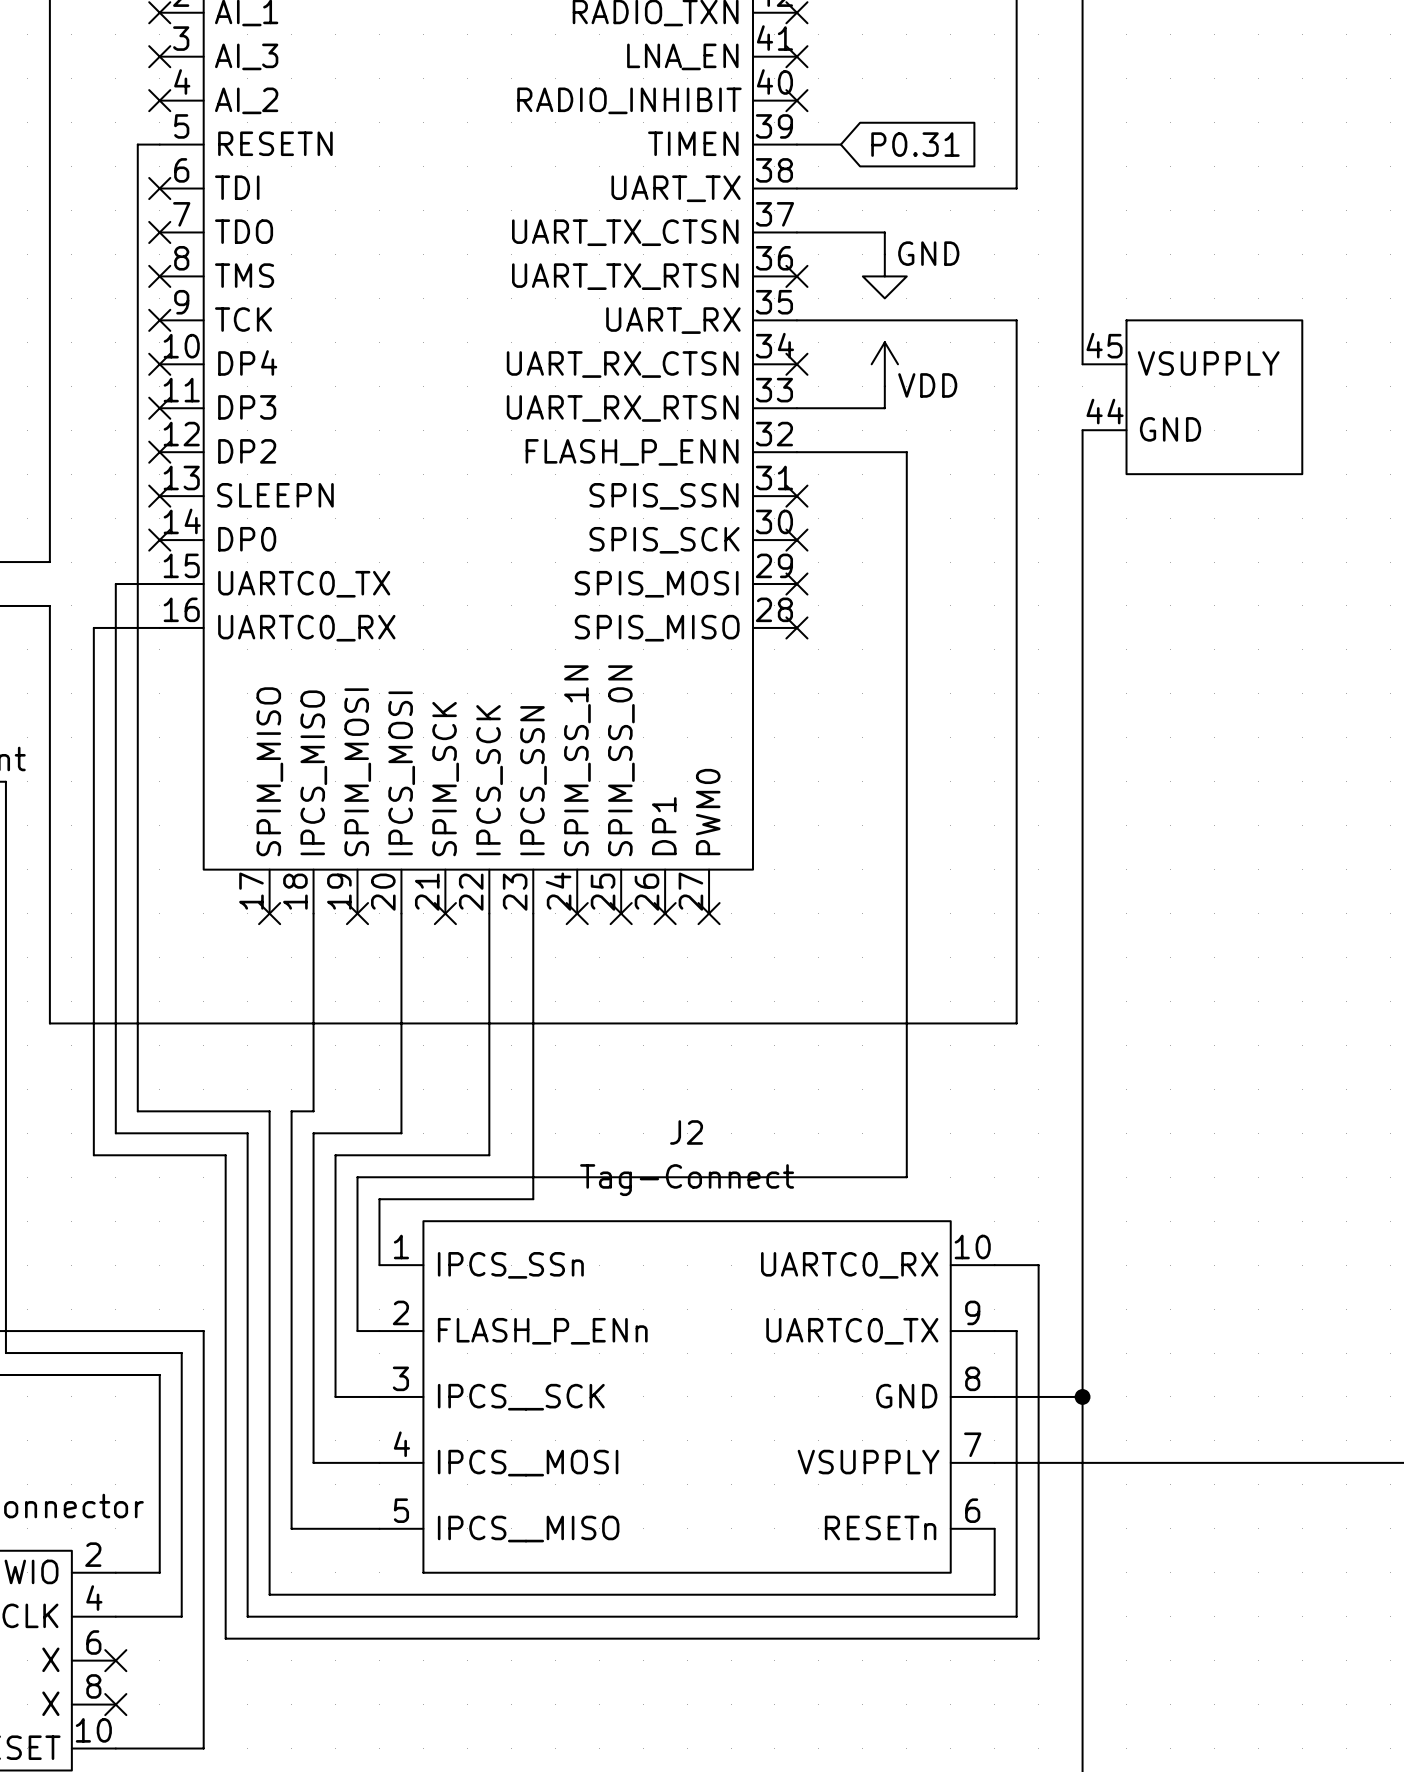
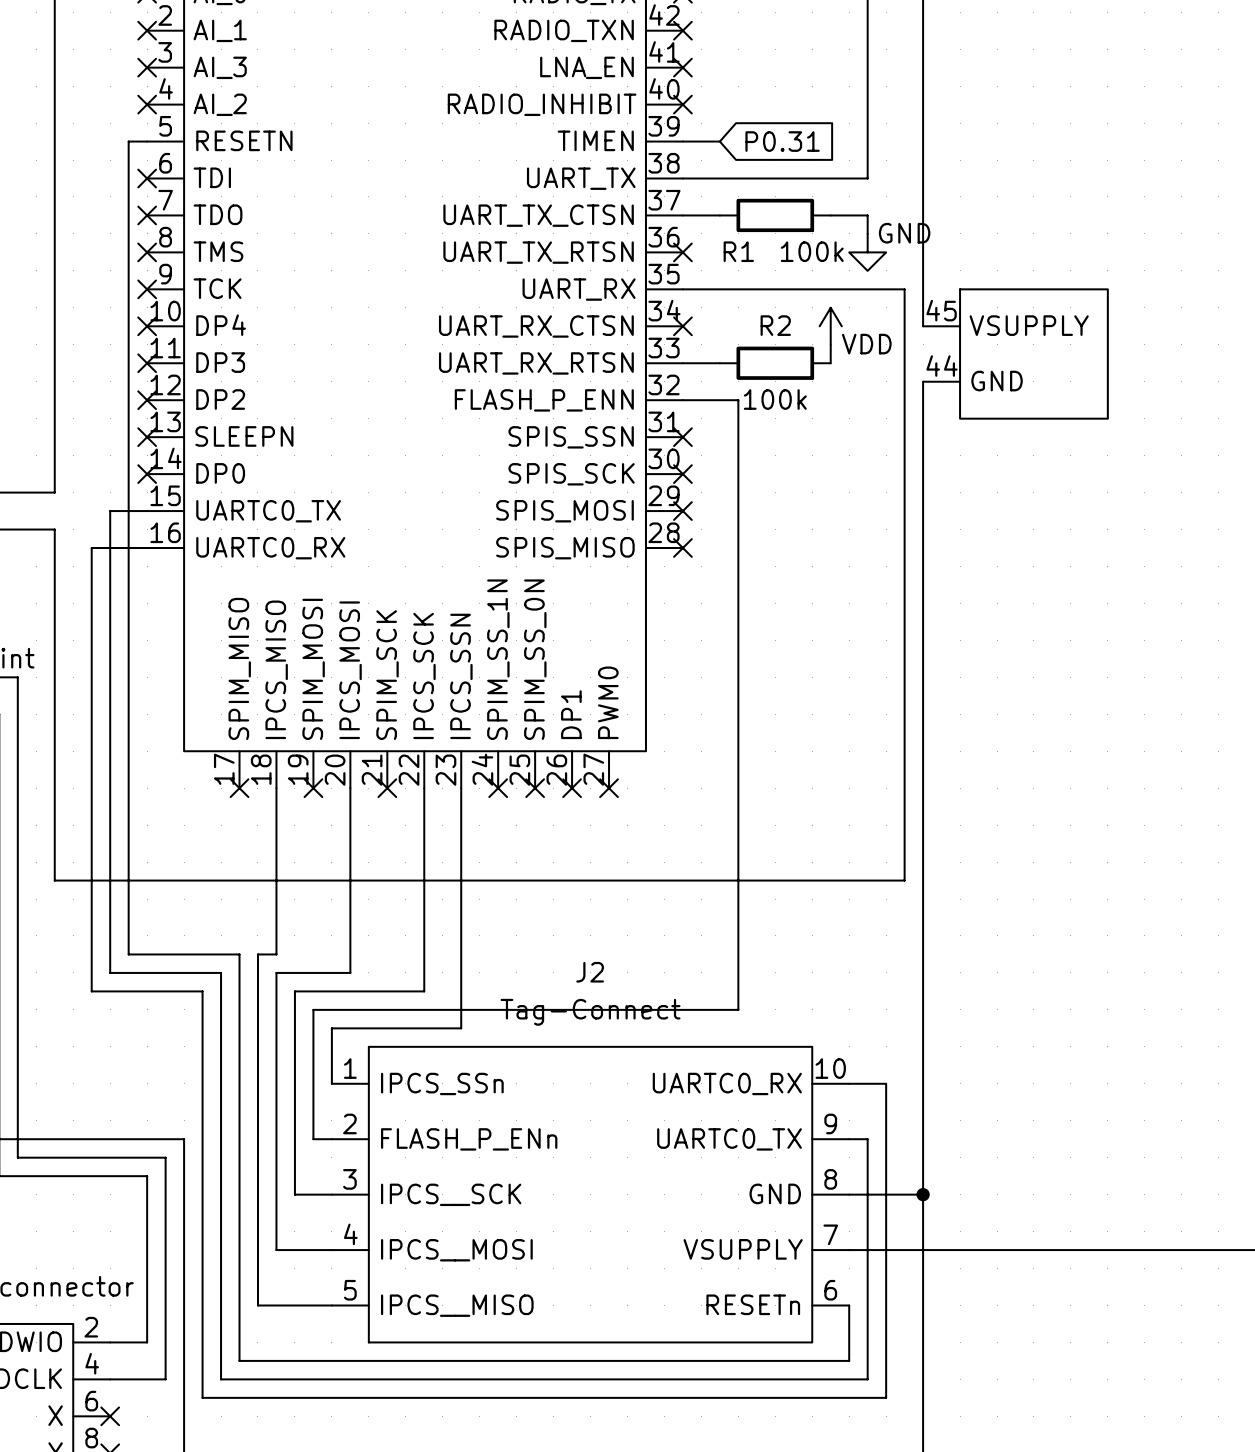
wire: (840, 232) (884, 232) (884, 254) -> (830, 215) (867, 215) (867, 233)
R1: none -> 100k (775, 215)
power symbol position: GND (884, 276) -> GND (867, 252)
wire: (1016, 320) (1016, 1023) -> (867, 289) (904, 289) (904, 880) (867, 880)
power symbol position: VDD (884, 364) -> VDD (830, 326)
wire: (884, 386) (884, 408) (840, 408) -> none
wire: none -> (830, 344) (830, 363)
R2: none -> 100k (775, 363)
wire: (862, 452) (906, 452) (906, 1177) (862, 1177) -> (738, 400) (738, 1009)

